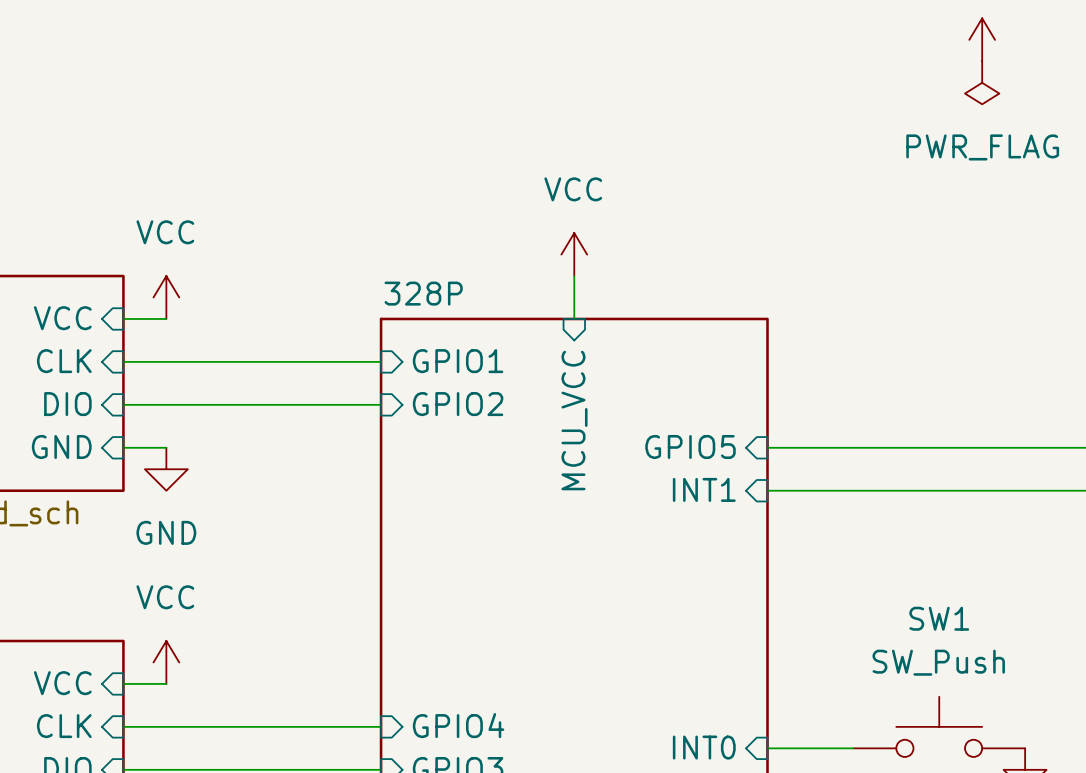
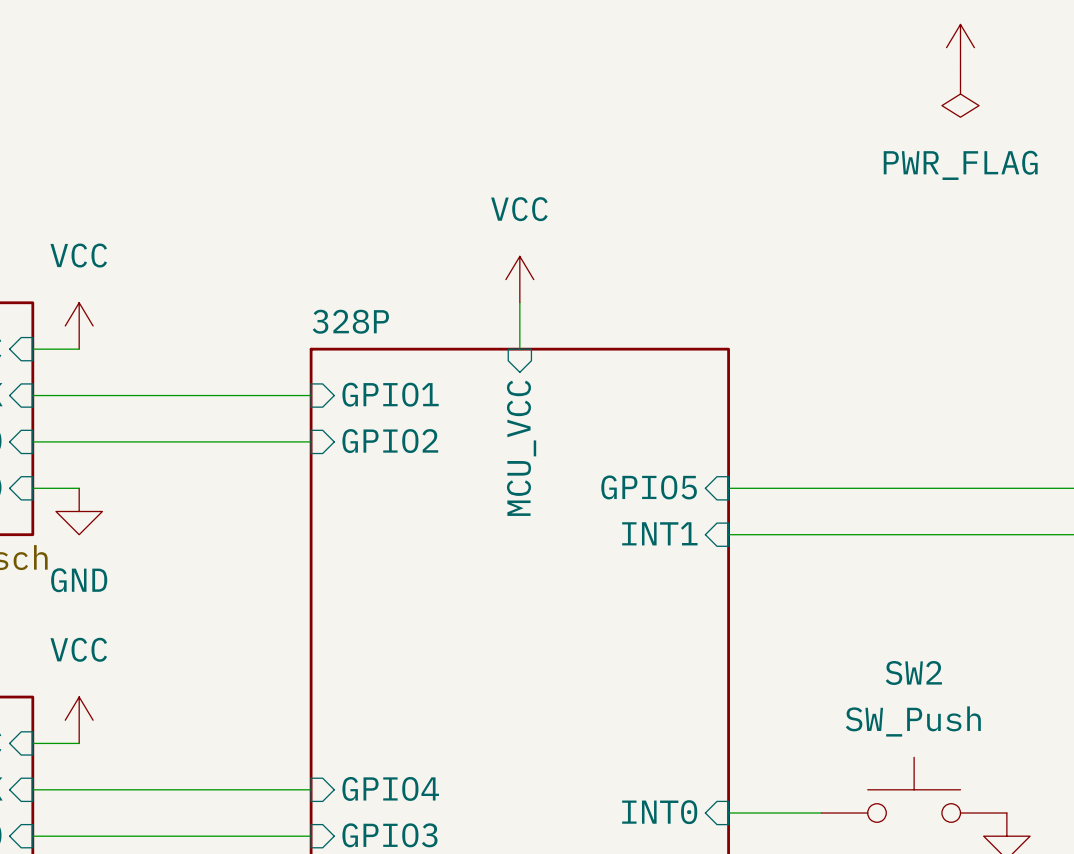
SW1 name: SW1 (939, 618) -> SW2 (913, 672)

